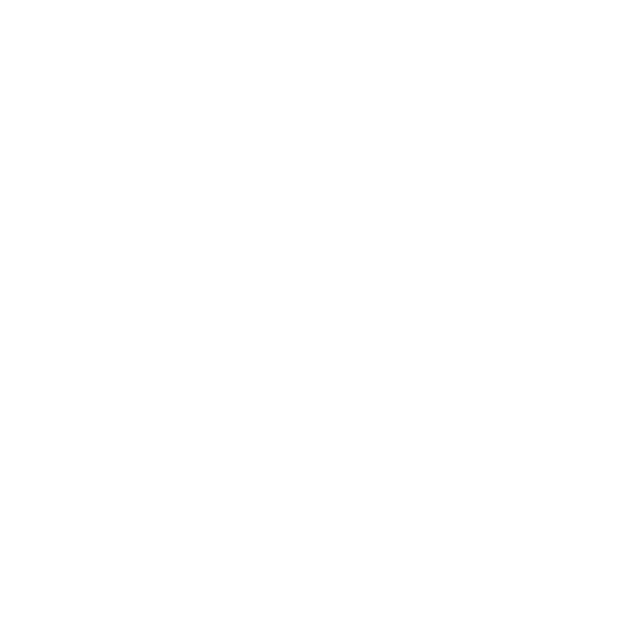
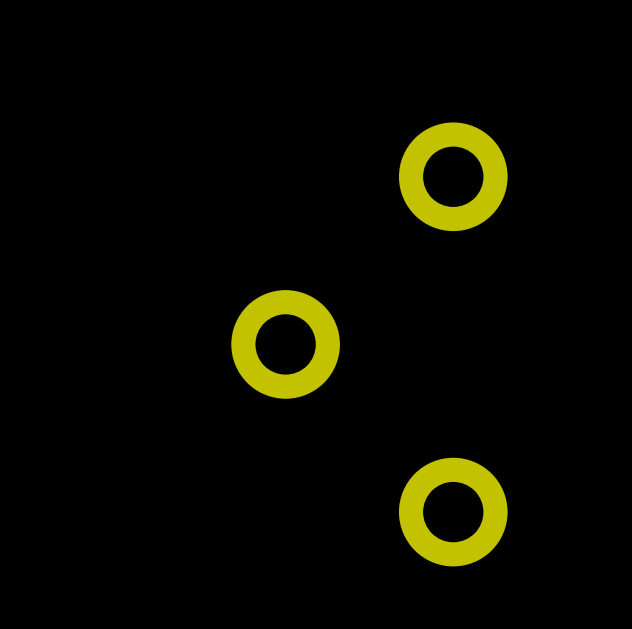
part: none -> (369, 344)

